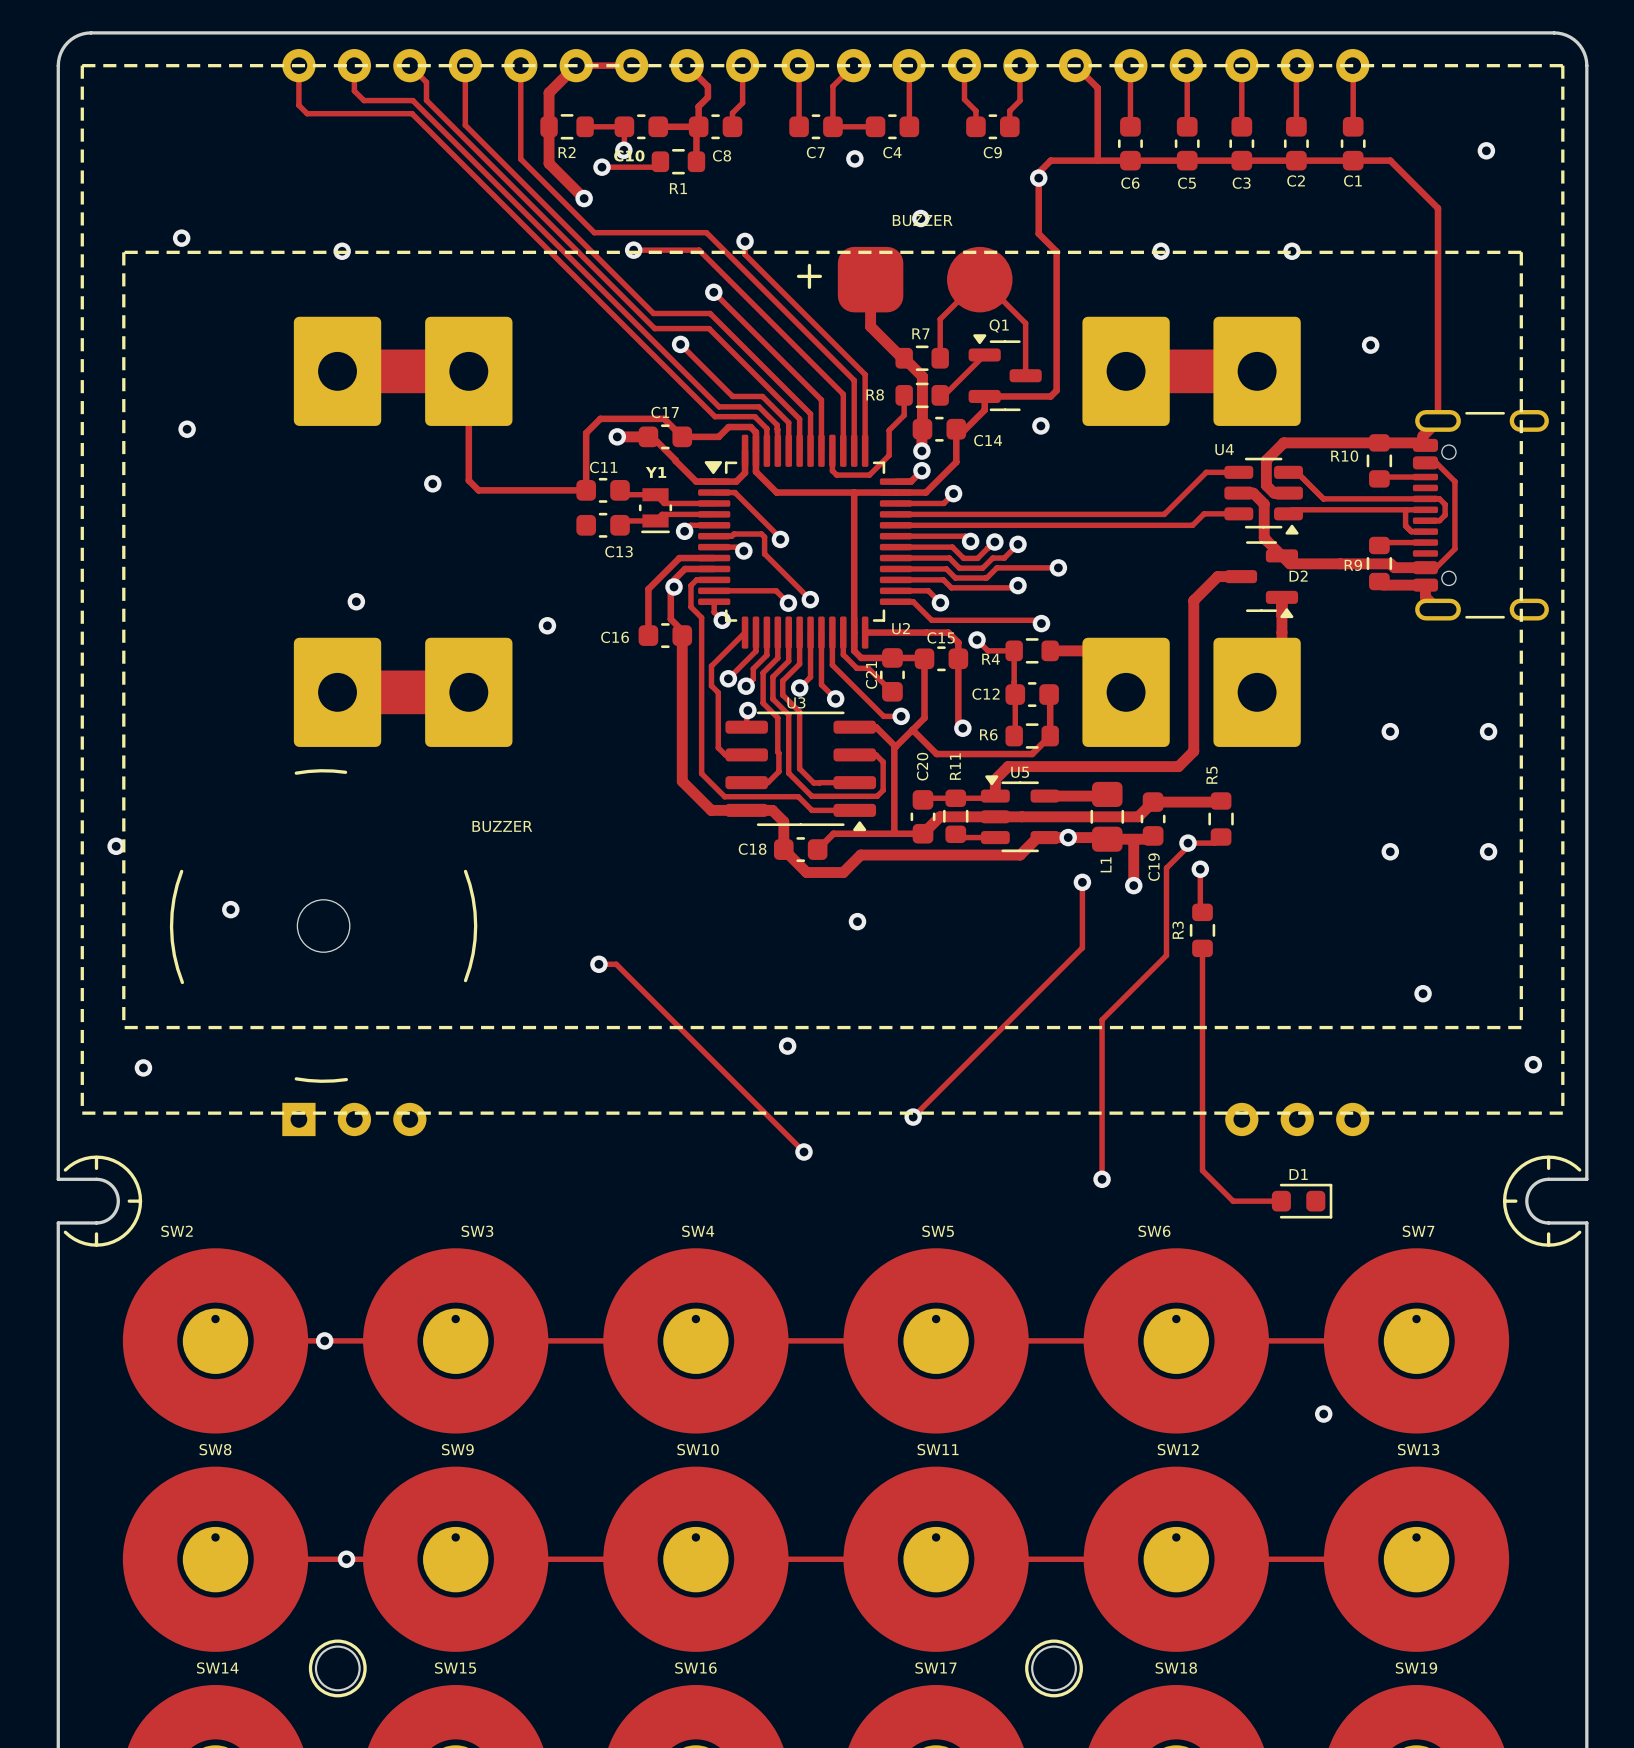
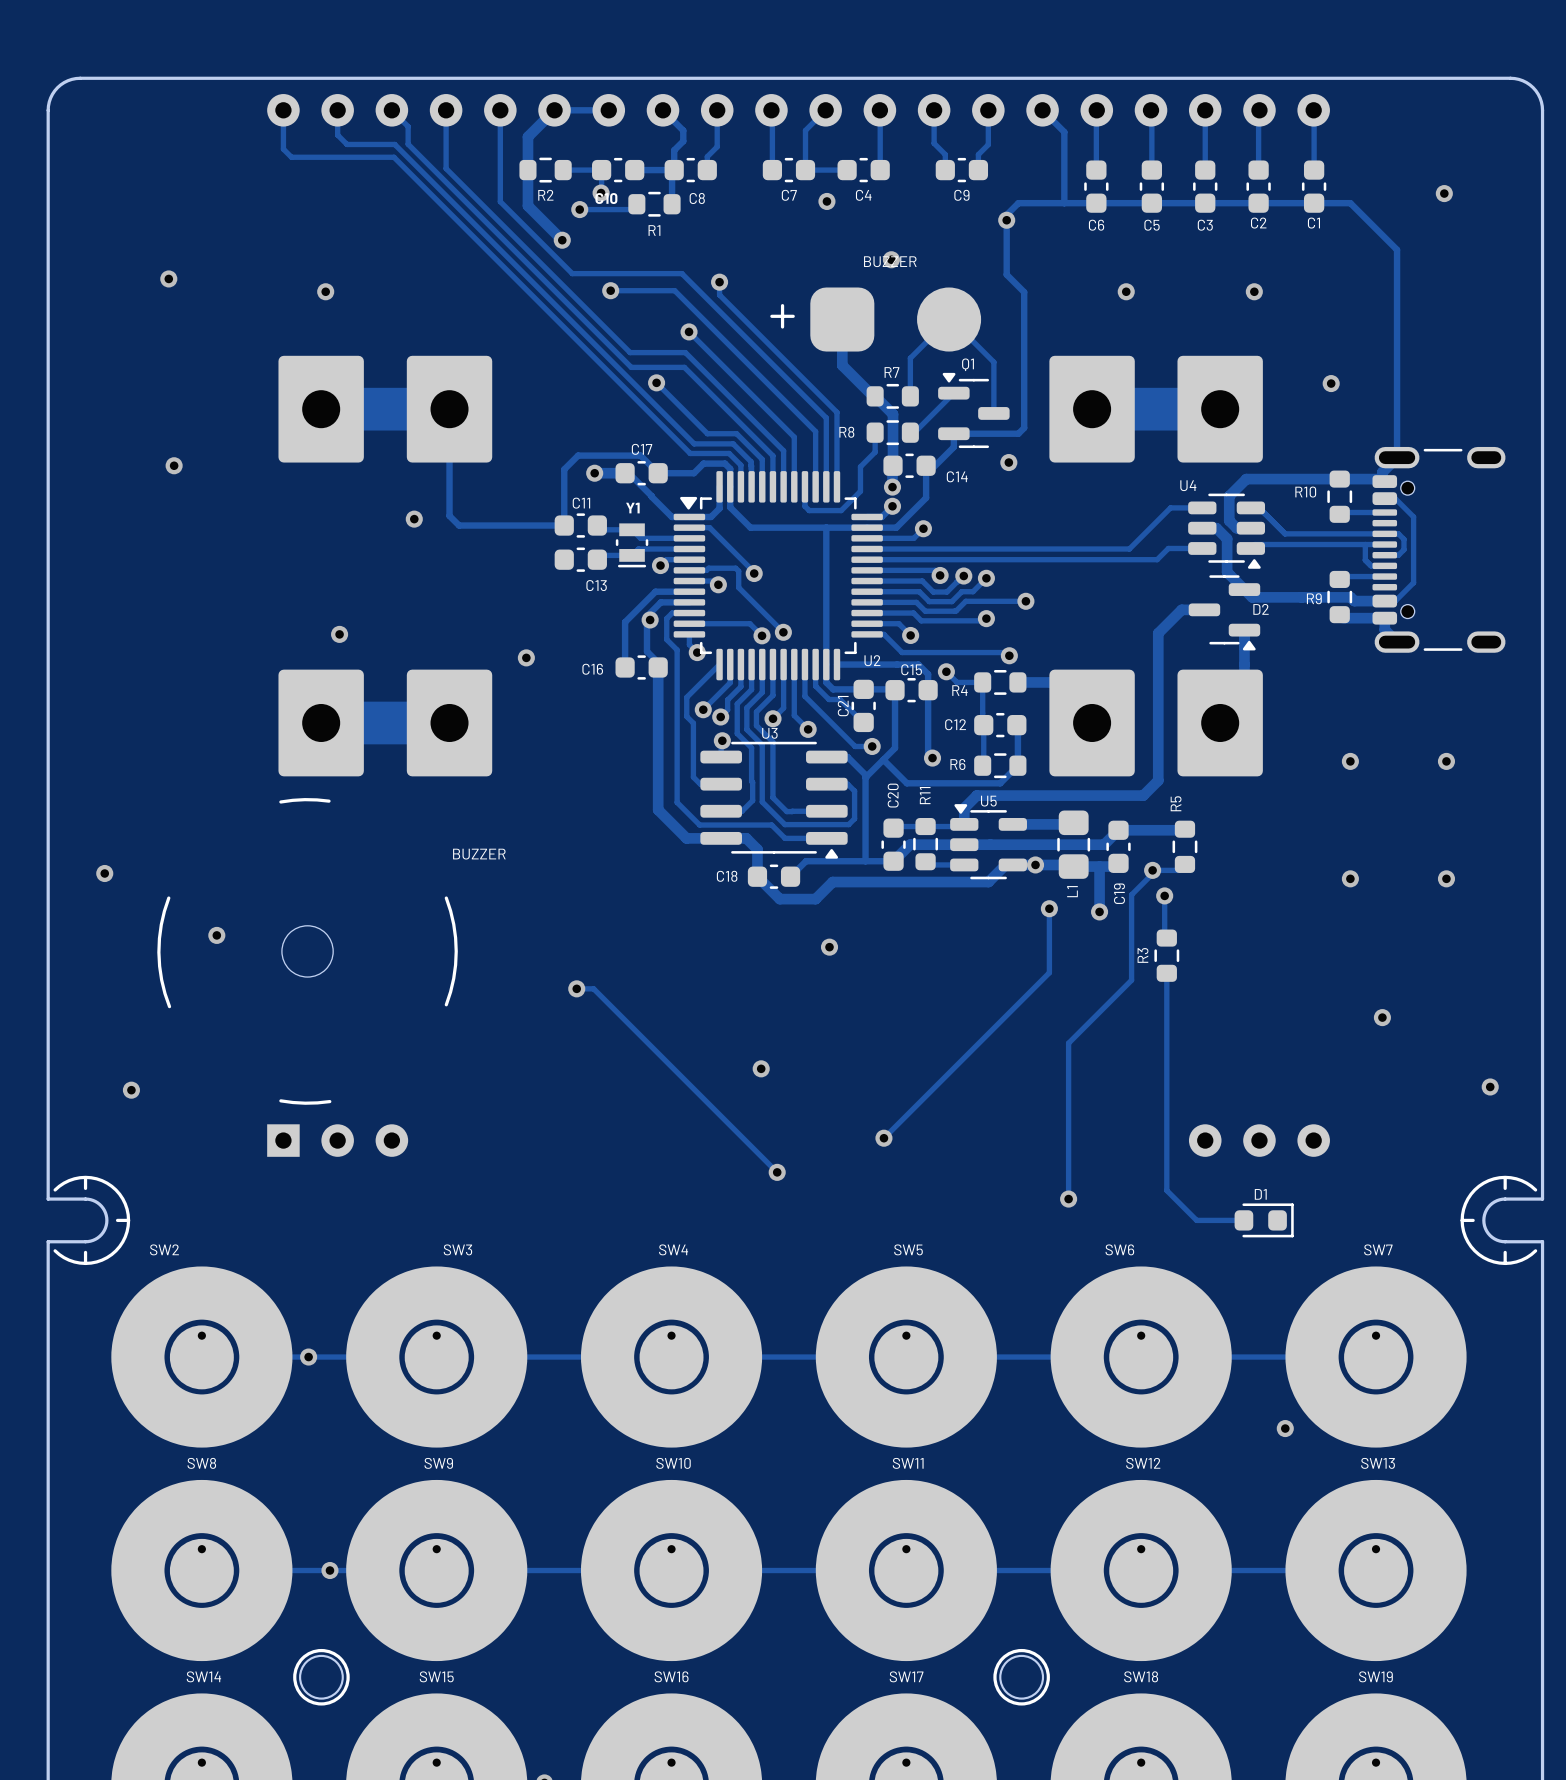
line: (123, 252) (1521, 252) (1521, 1027) (123, 1027) (123, 252) -> none
line: (82, 1112) (82, 65) (1562, 65) (1562, 1112) -> none
line: (82, 1113) (1562, 1113) -> none

